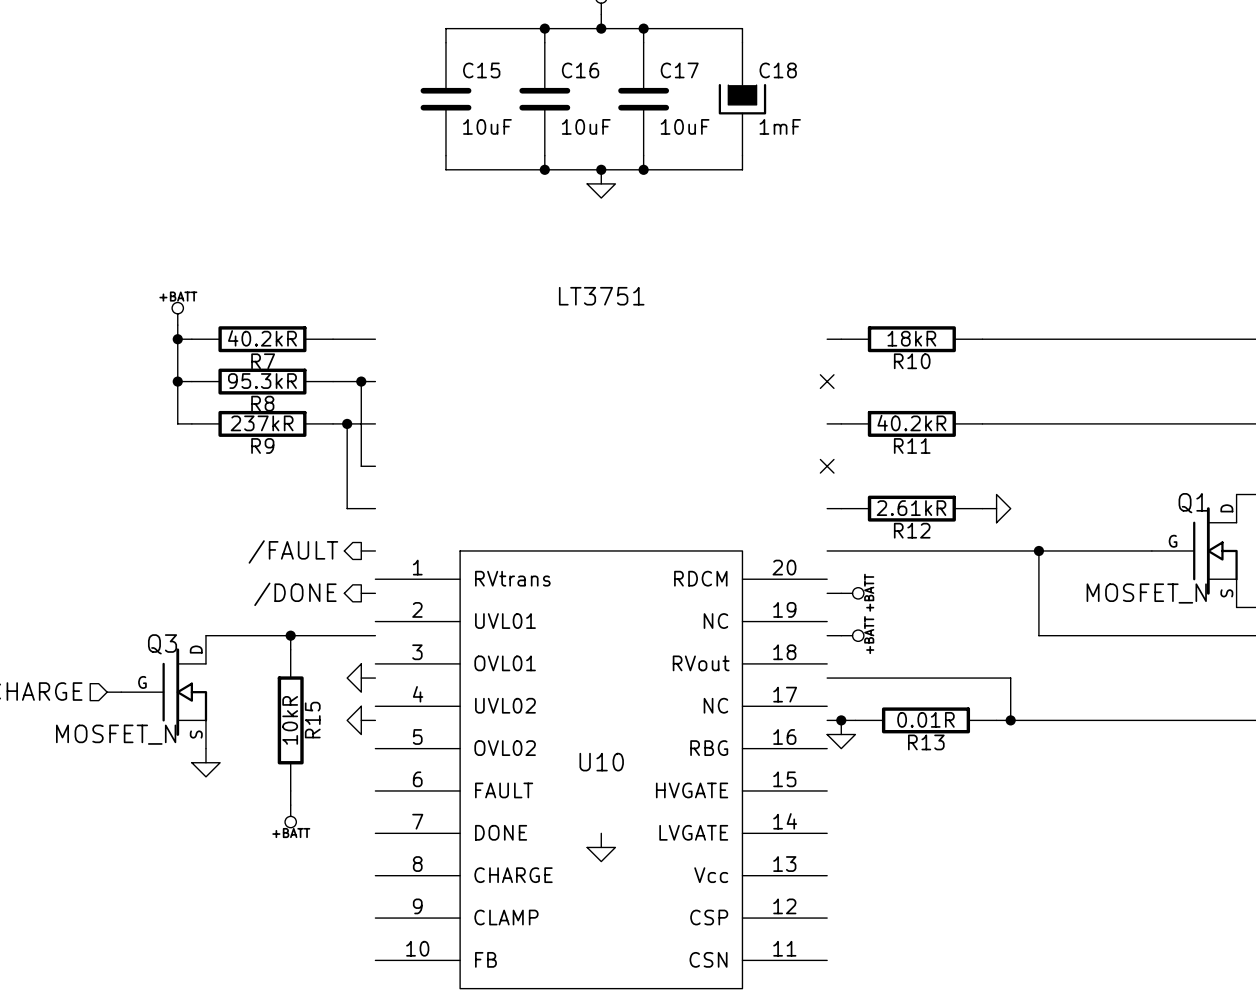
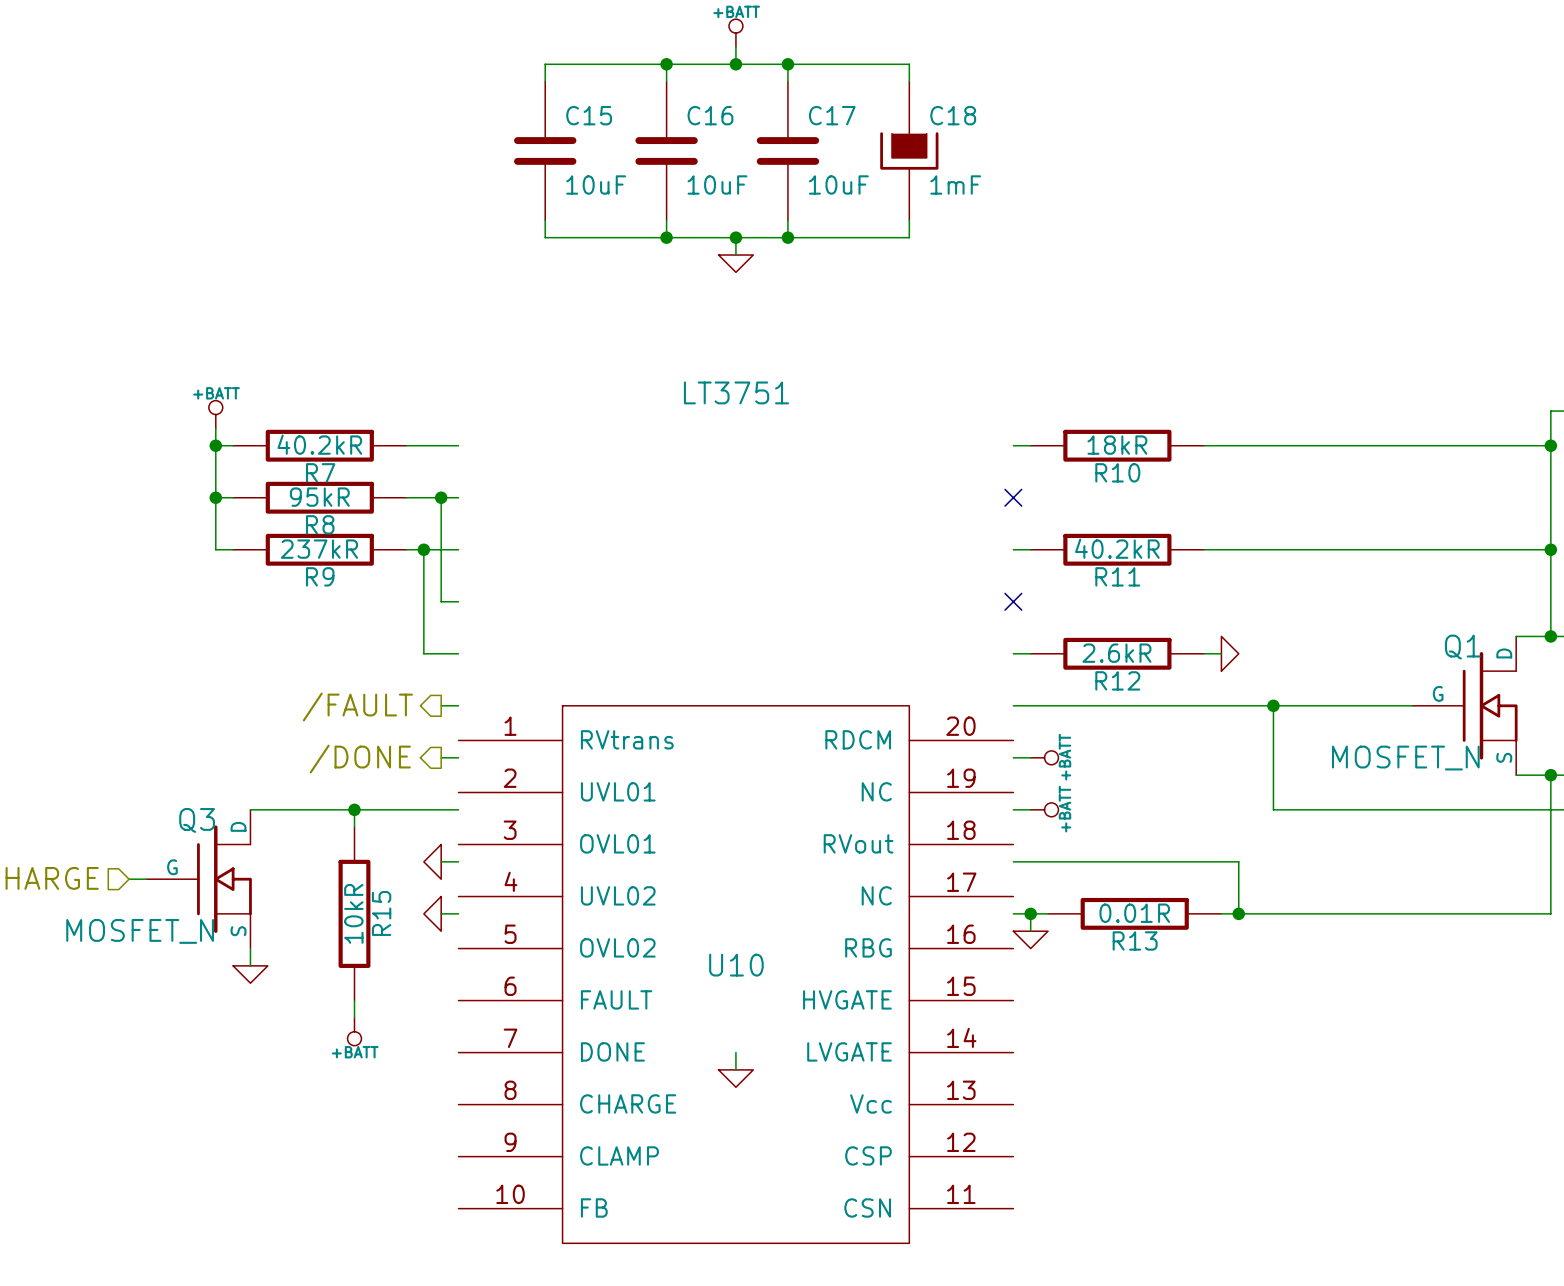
R8 value: 95.3kR (262, 381) -> 95kR (319, 497)
R12 value: 2.61kR (911, 508) -> 2.6kR (1116, 653)

